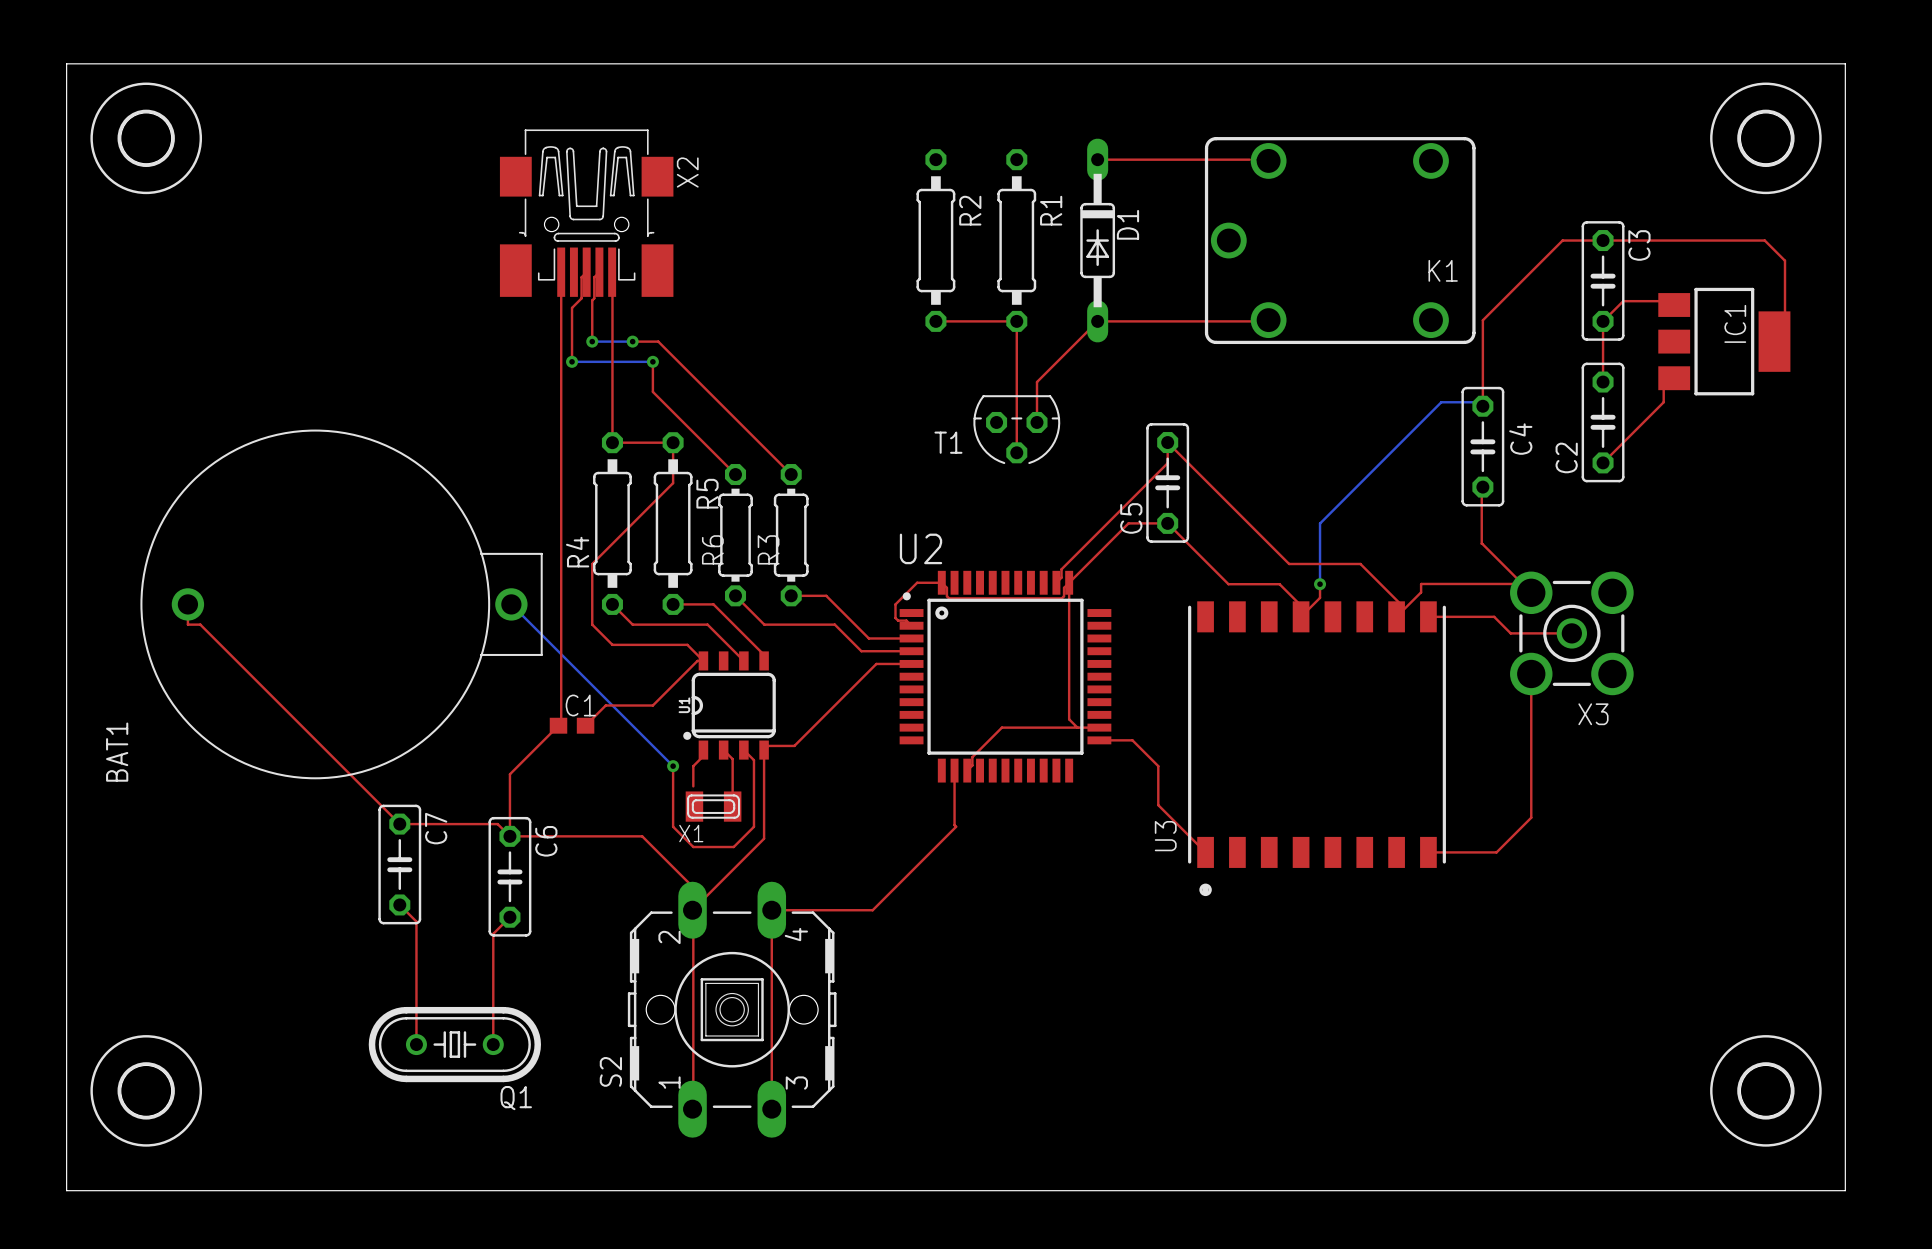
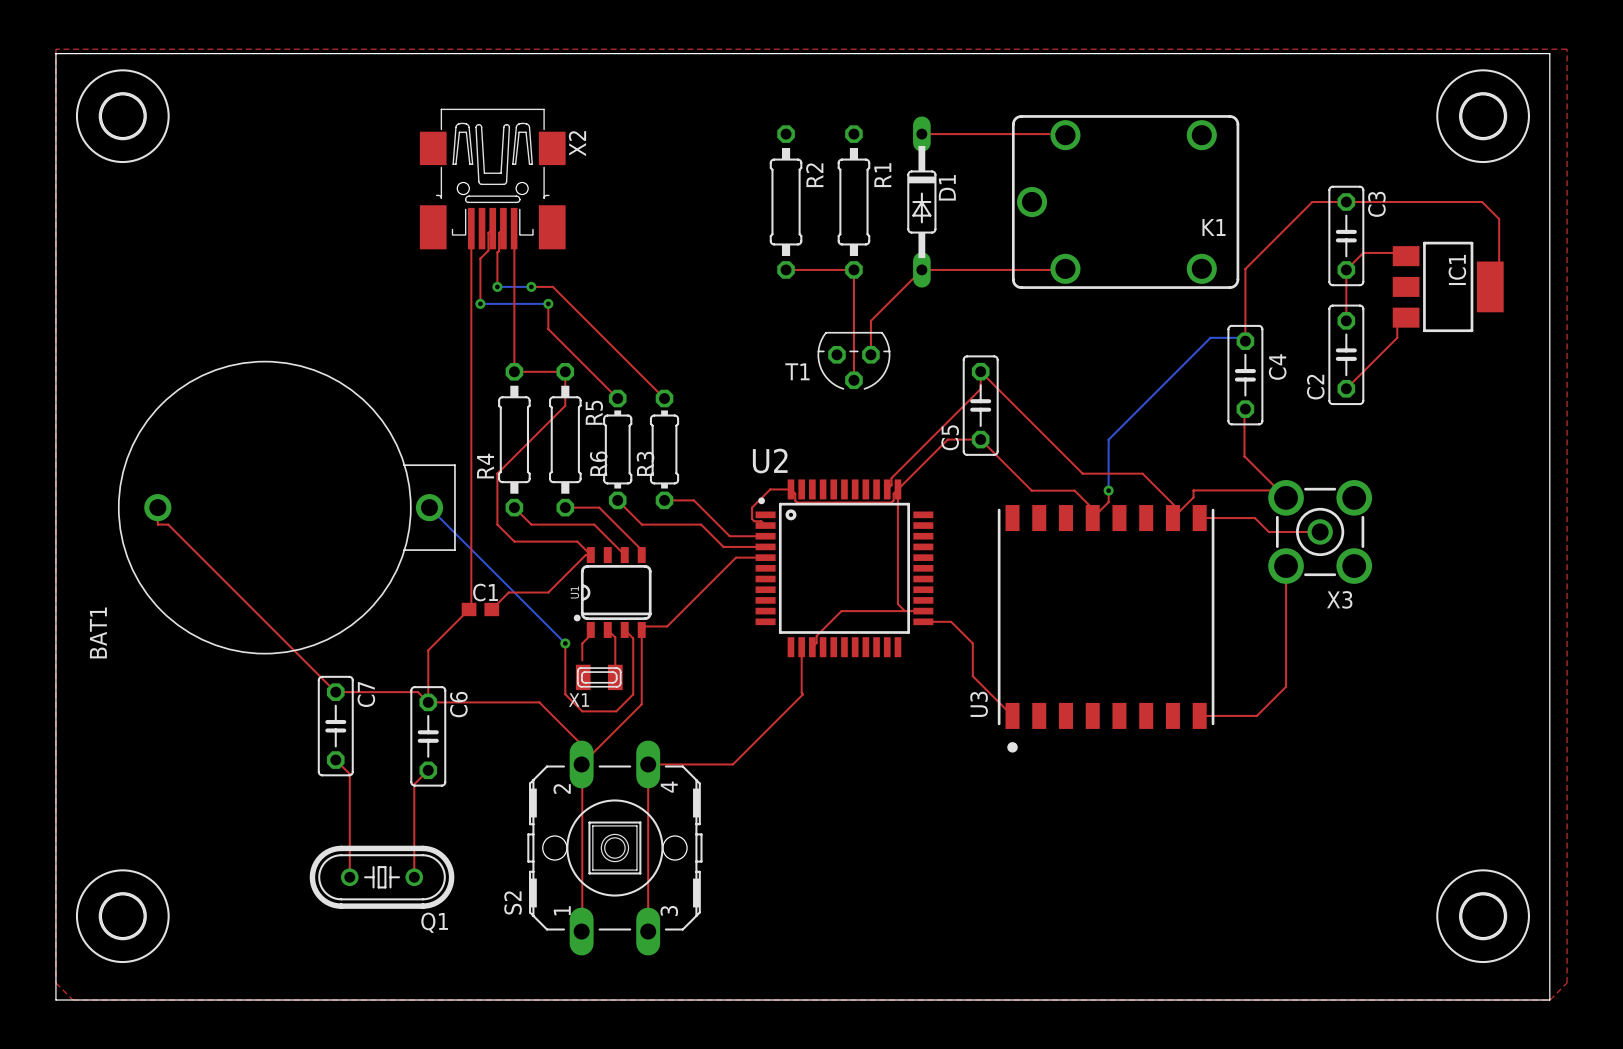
top zone outline: none -> (55, 49) (55, 983) (72, 1000) (1550, 1000) (1567, 983) (1567, 49) (55, 49)

